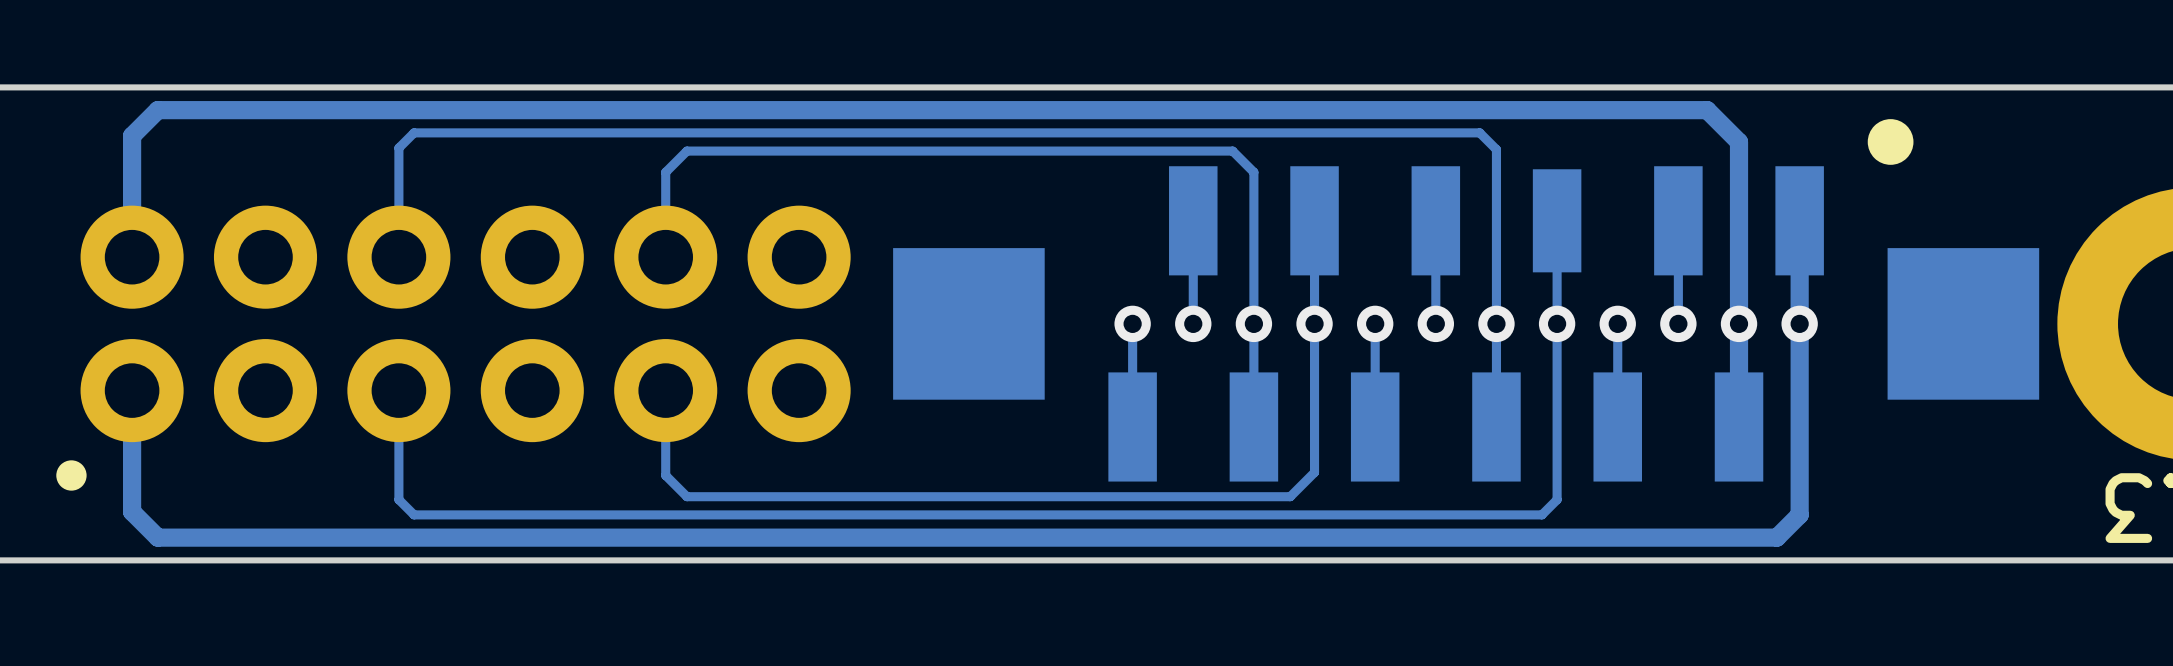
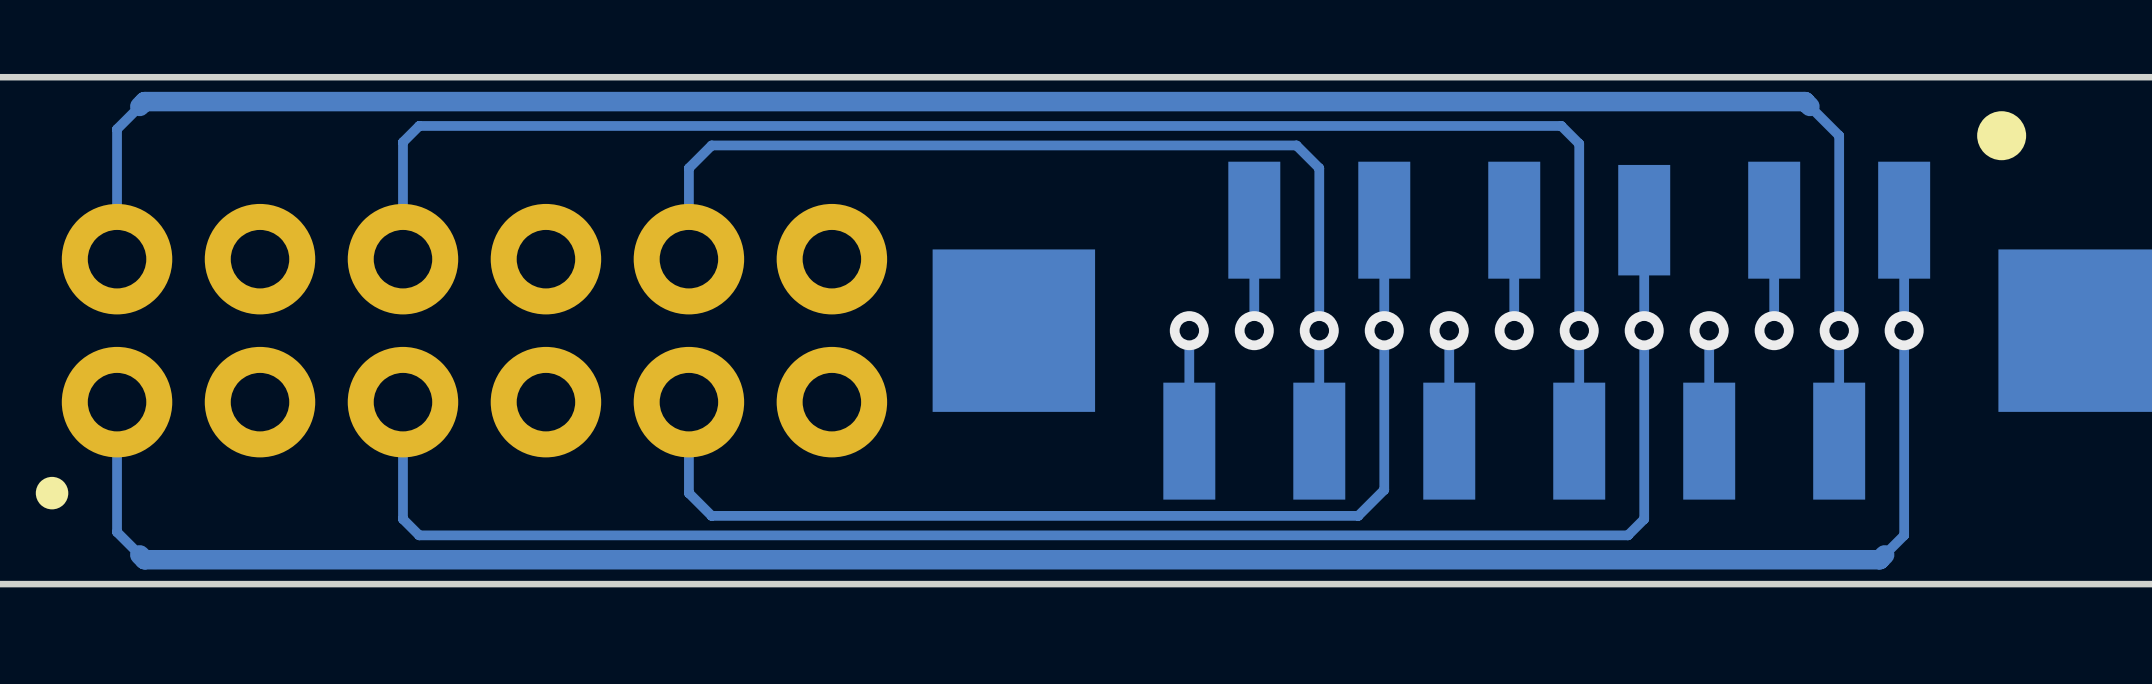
track width: thick (153, 114) (132, 135) (132, 257) -> thin (139, 106) (117, 129) (117, 259)
track width: thick (1711, 114) (1739, 141) (1739, 426) -> thin (1809, 106) (1839, 135) (1839, 441)
track width: thick (1799, 220) (1799, 514) (1781, 533) -> thin (1904, 220) (1904, 535) (1884, 554)
track width: thick (132, 390) (132, 511) (153, 533) -> thin (117, 402) (117, 532) (139, 554)

